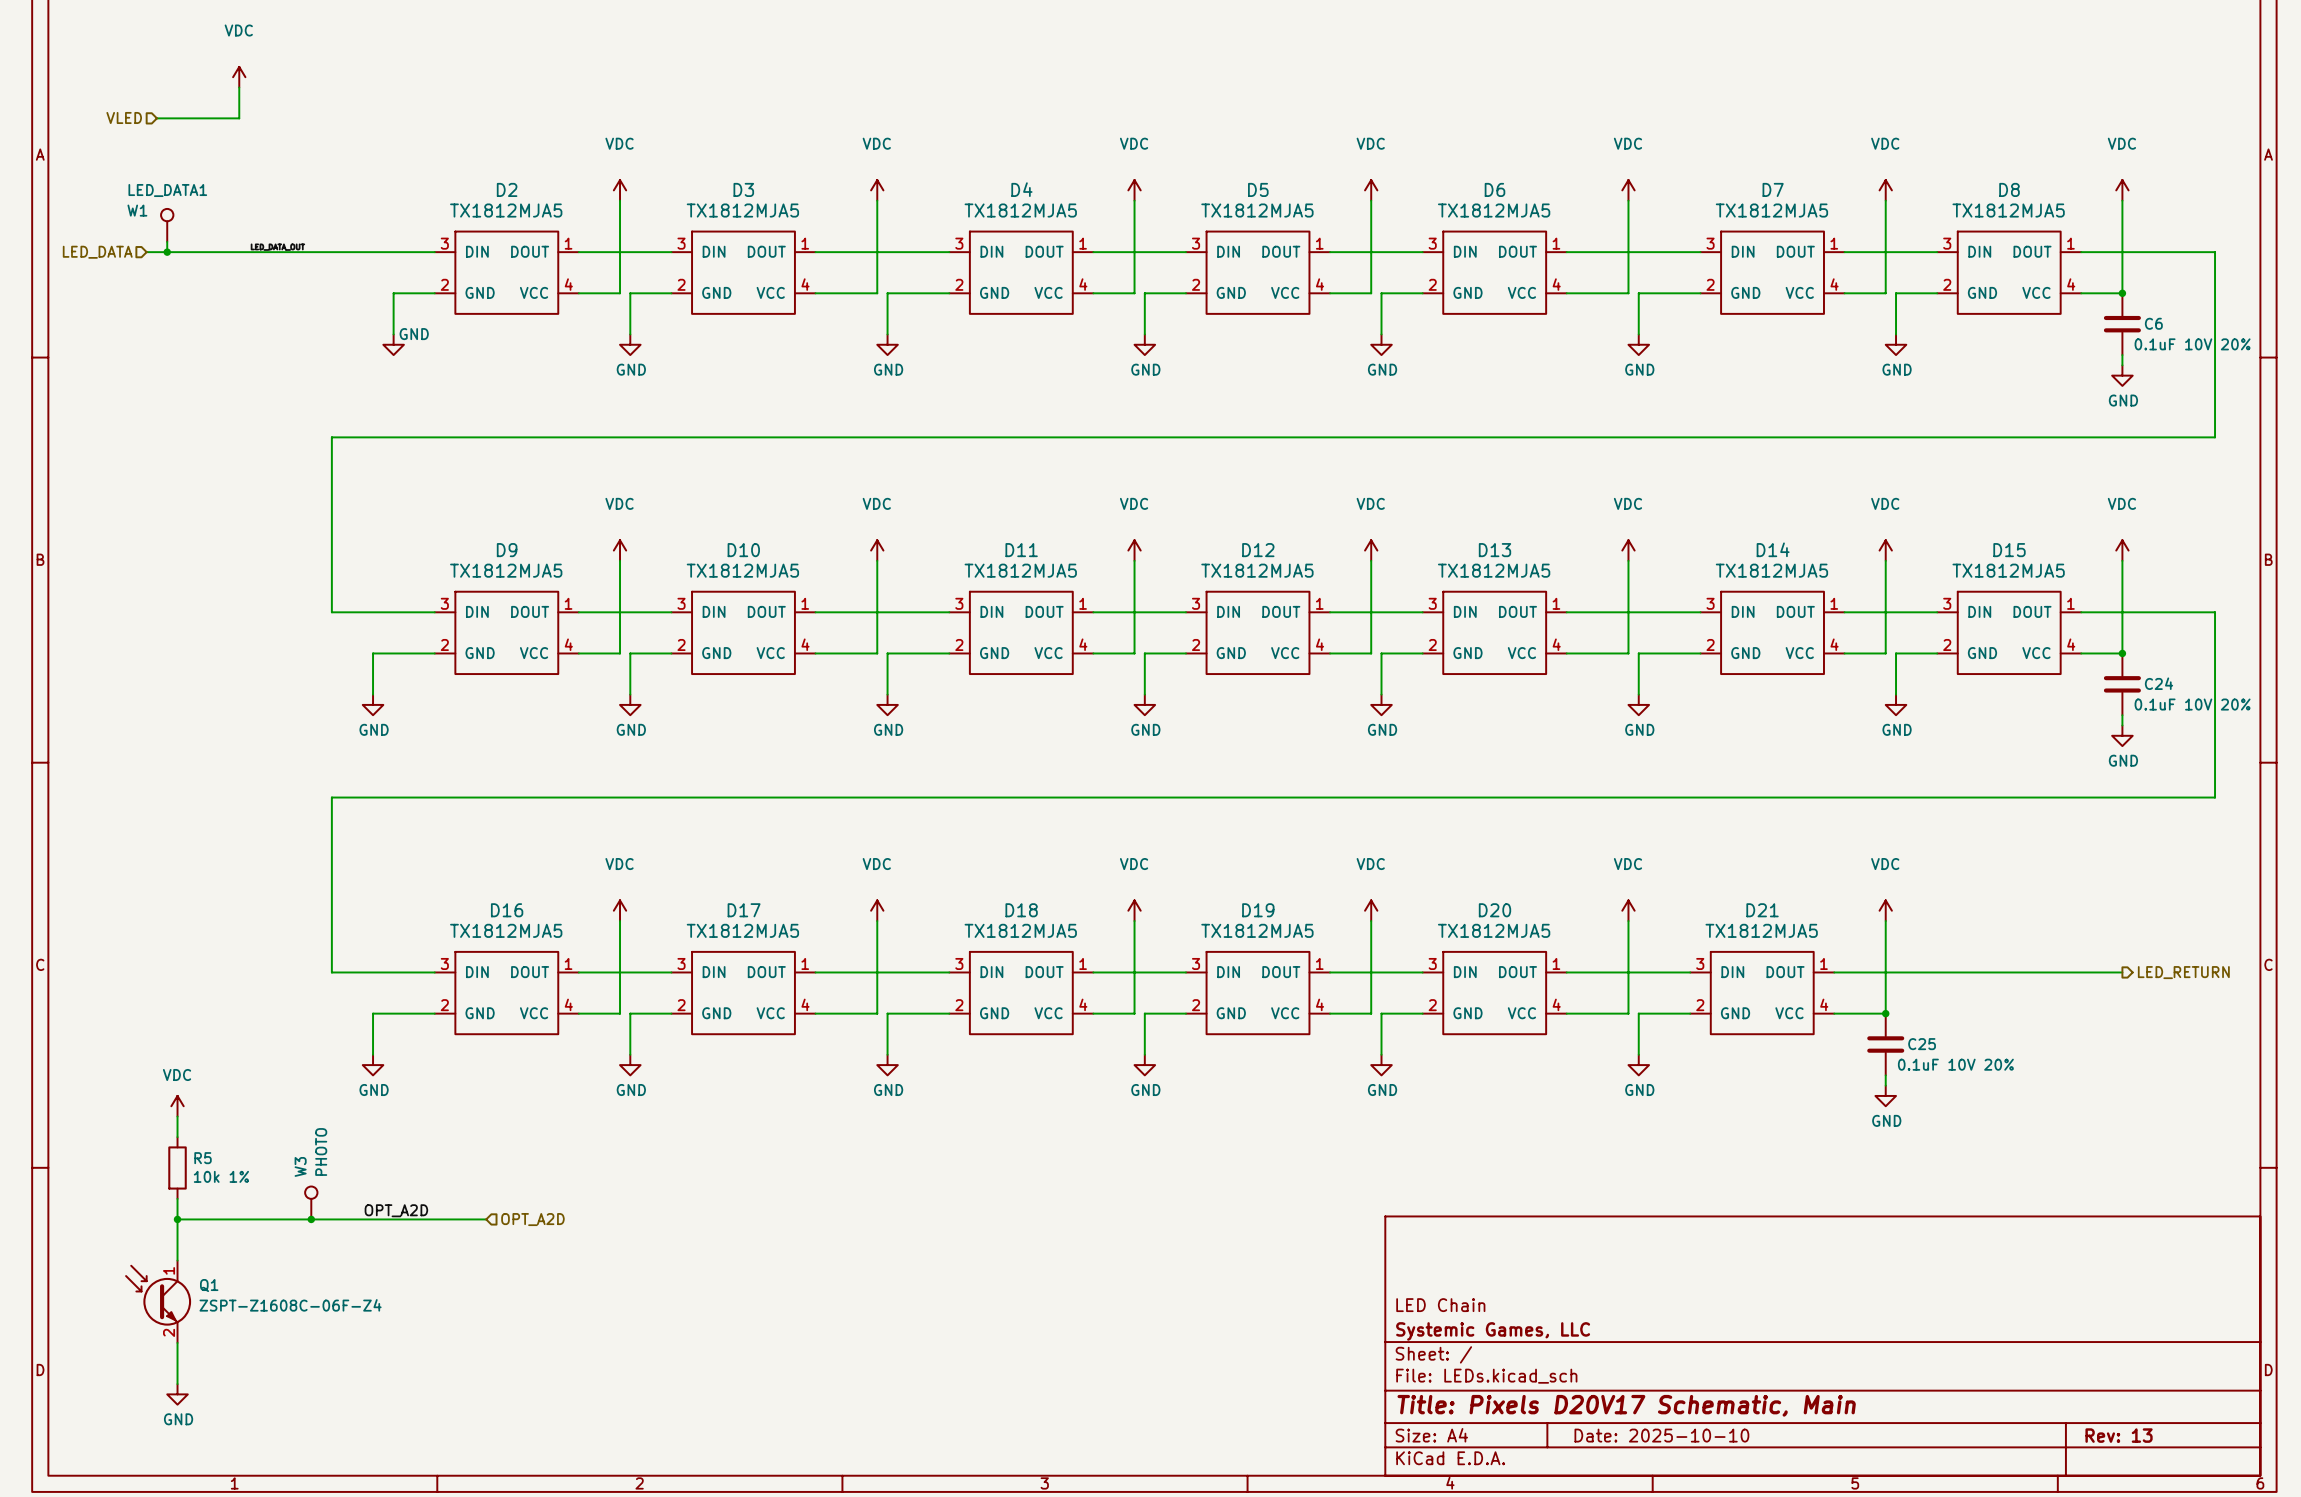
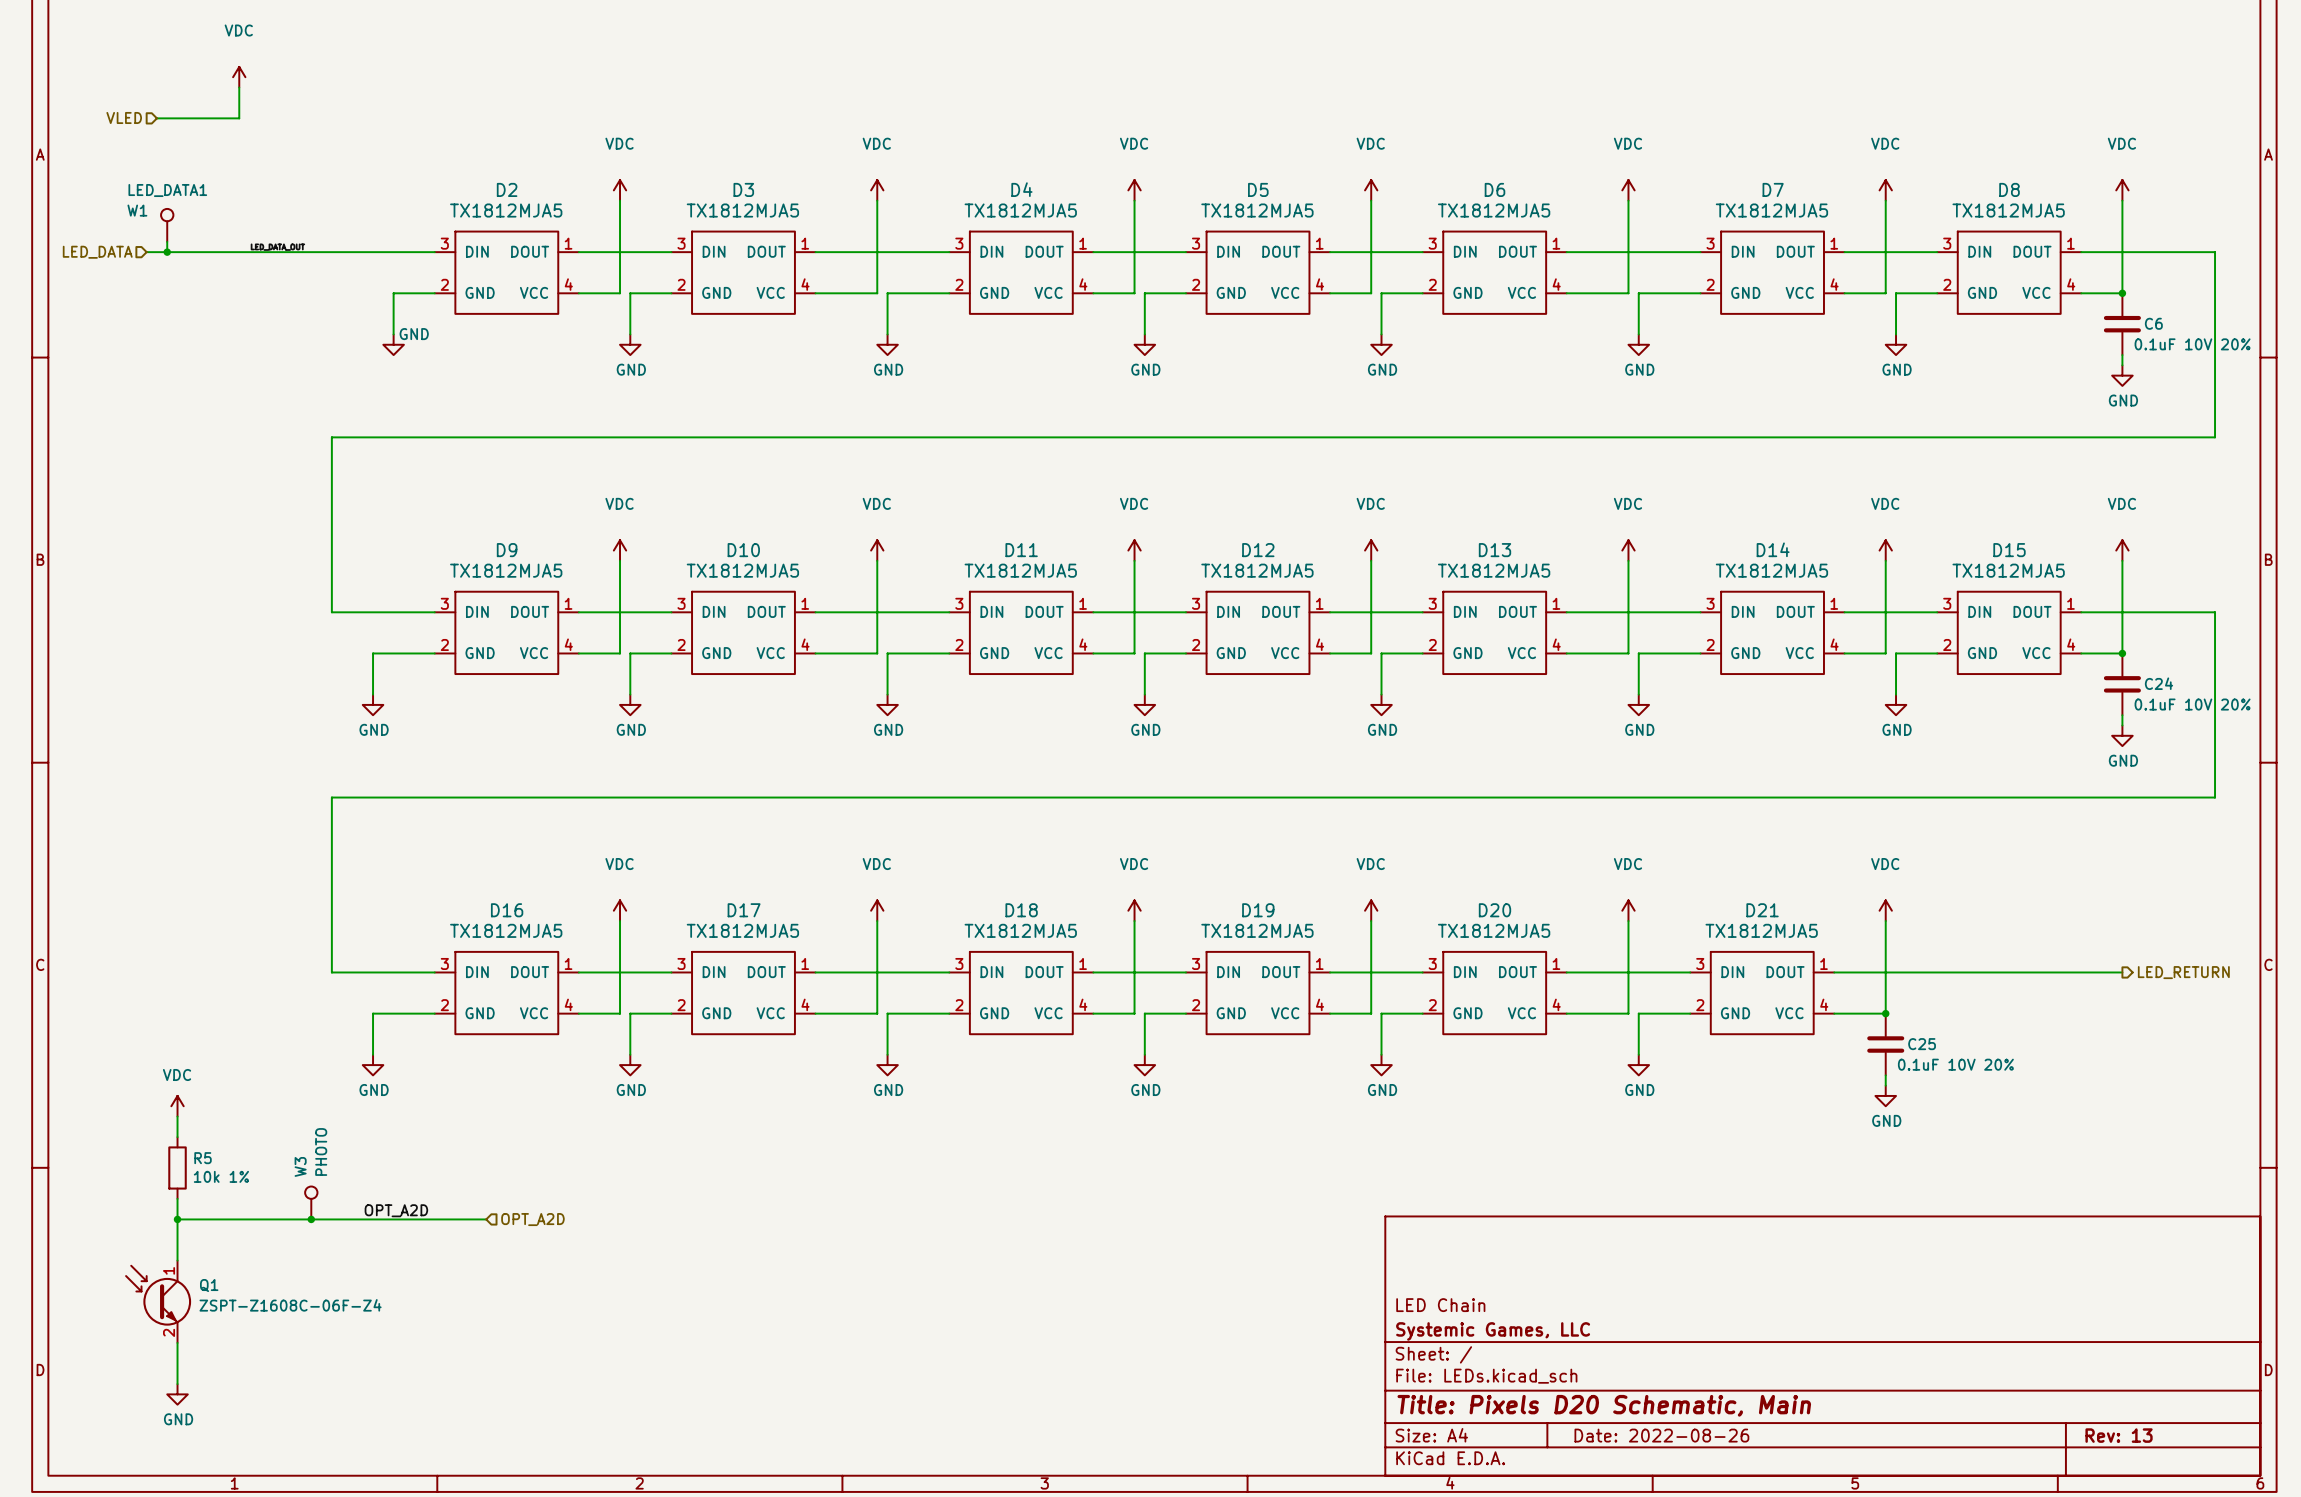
title block: Title: Pixels D20V17 Schematic, Main (1626, 1405) -> Title: Pixels D20 Schematic, Main (1604, 1405)
title block: Date: 2025-10-10 (1661, 1435) -> Date: 2022-08-26 (1661, 1435)

